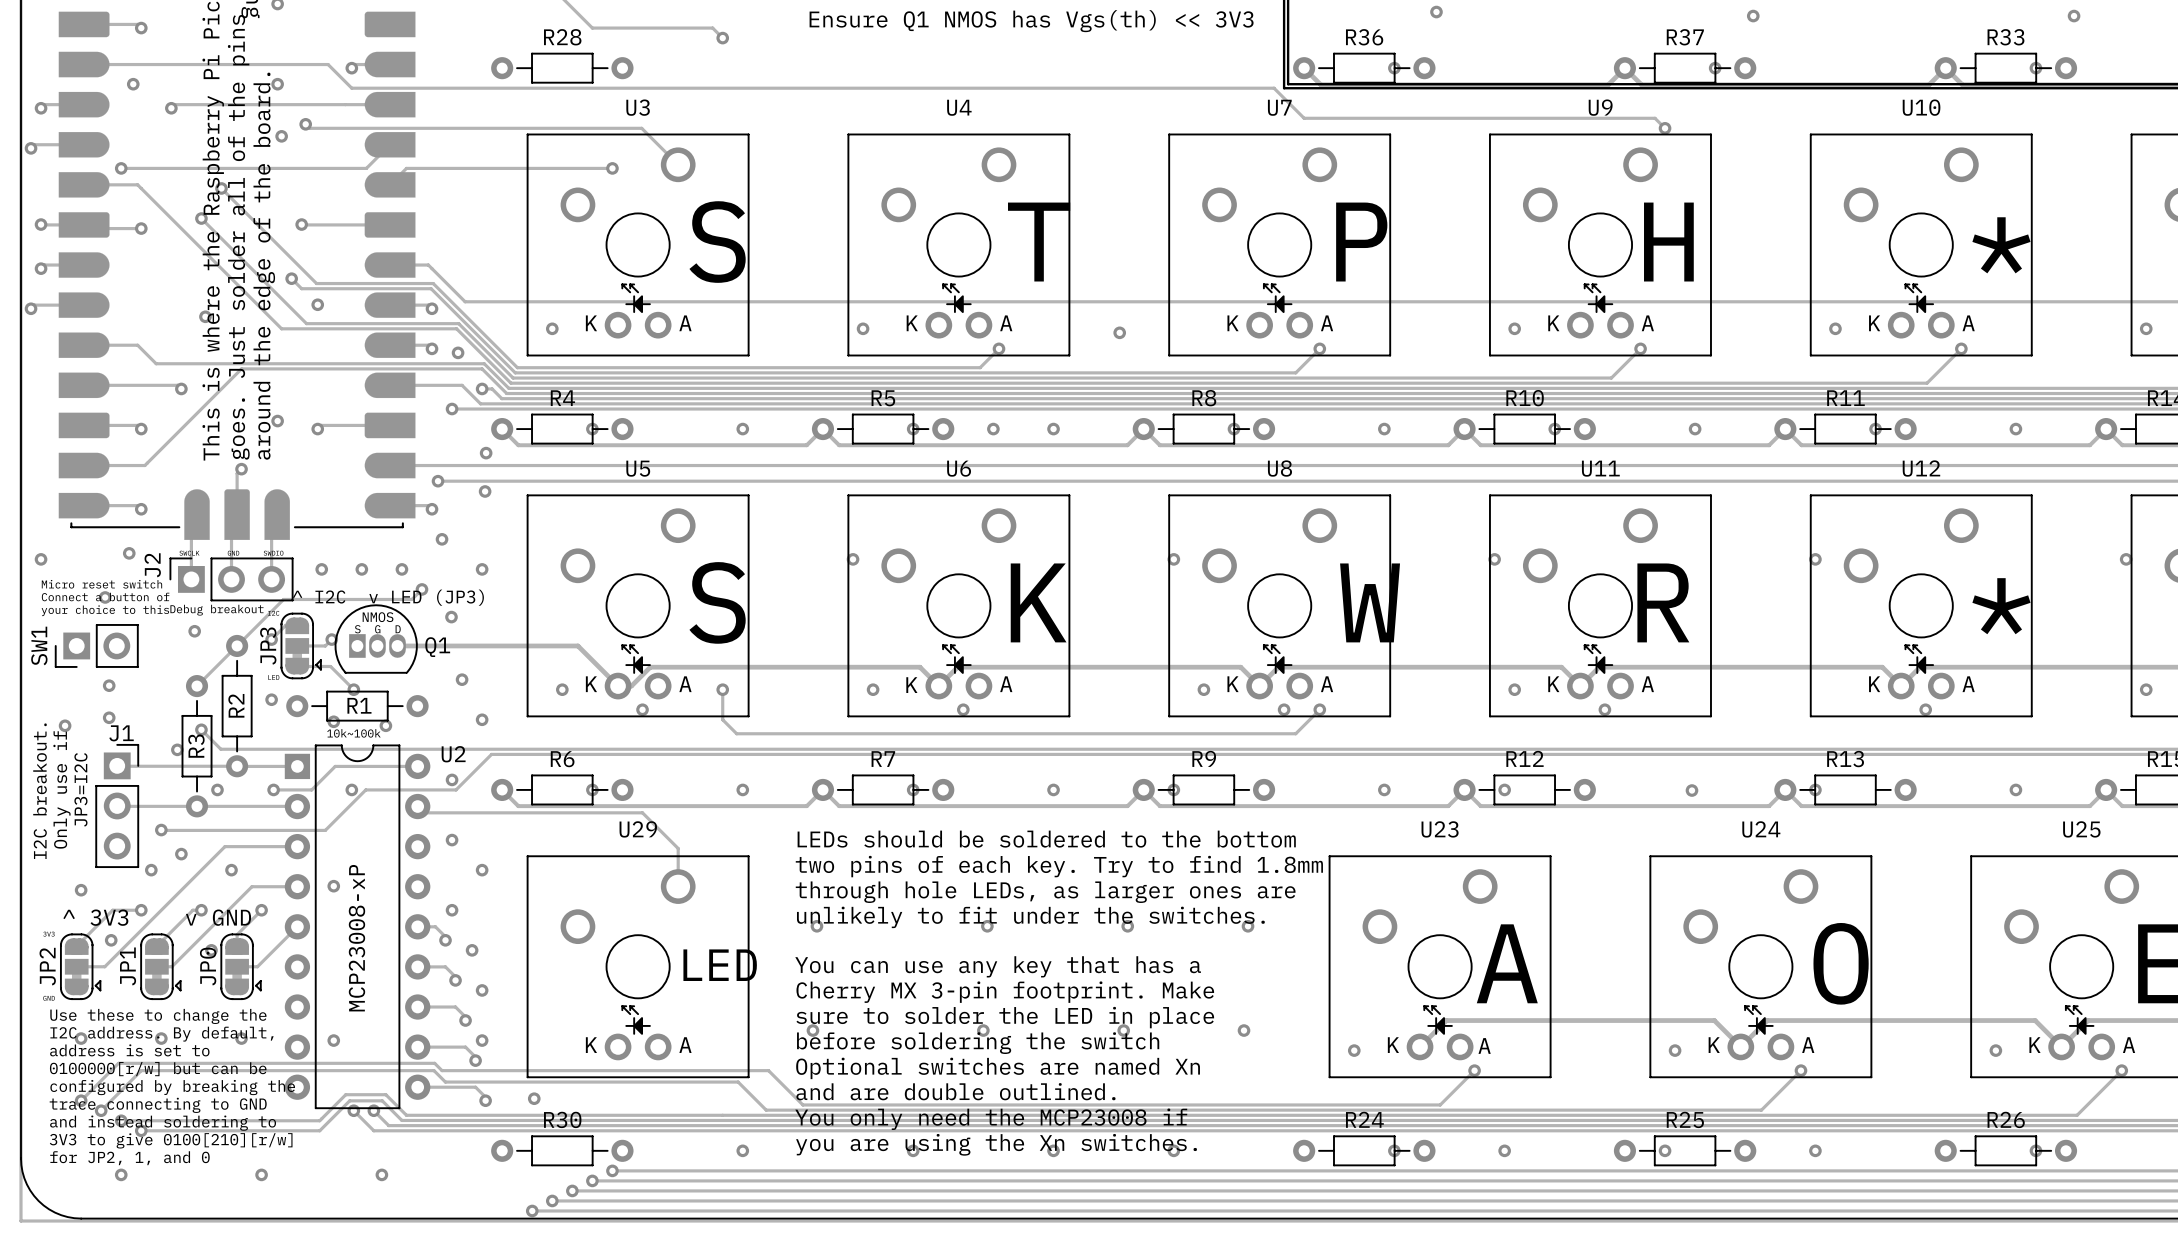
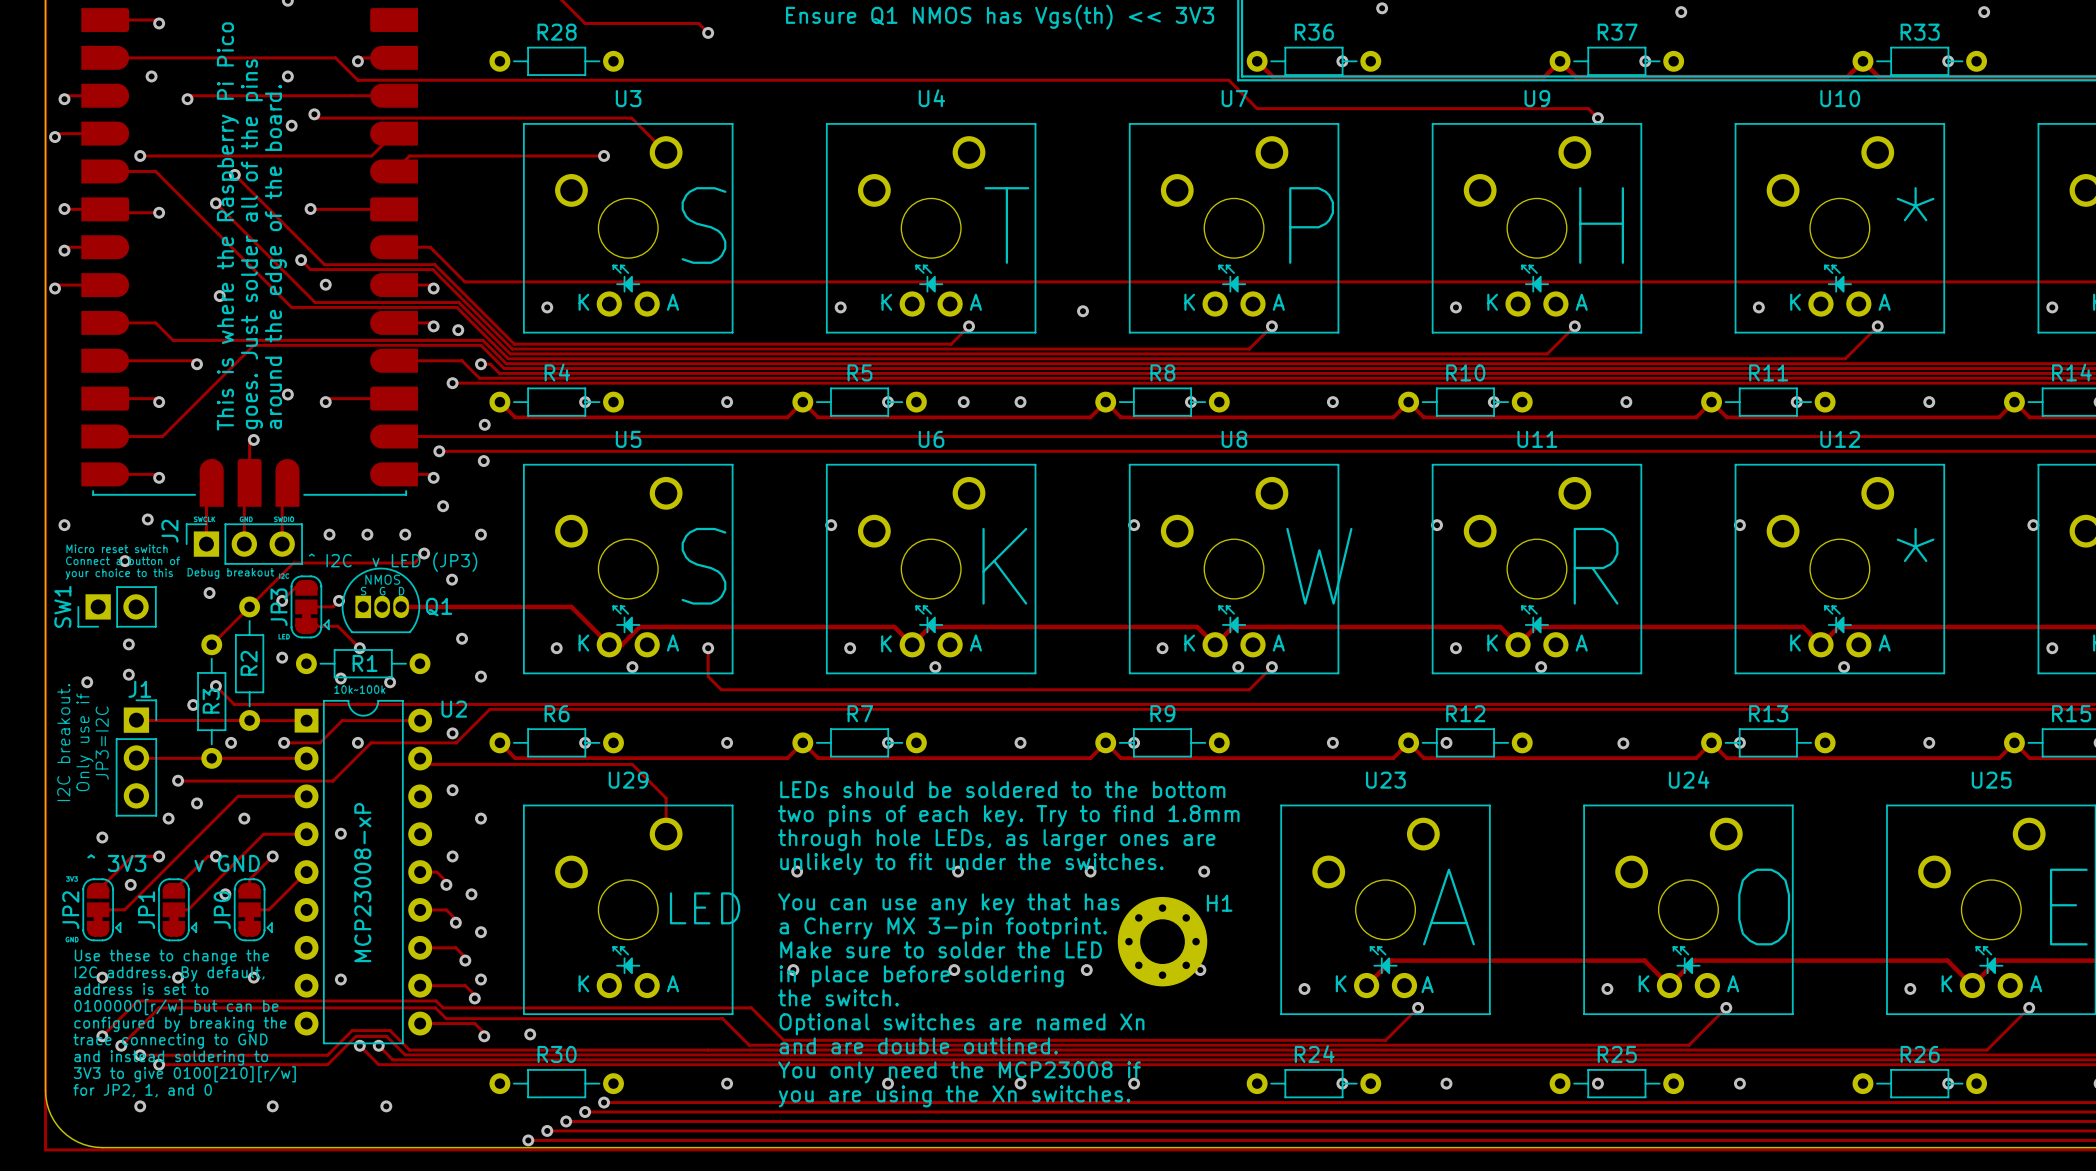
text: You can use any key that has a (998, 966) -> You can use any key that has (948, 904)
text: Cherry MX 3-pin footprint. Make (1005, 992) -> a Cherry MX 3-pin footprint. (943, 928)
H1: none -> (1162, 941)
text: sure to solder the LED in place (1005, 1017) -> Make sure to solder the LED (941, 949)
text: before soldering the switch (978, 1043) -> in place before soldering (921, 976)
text: Optional switches are named Xn (998, 1068) -> the switch. (838, 997)
text: and are double outlined. (955, 1091) -> Optional switches are named Xn (961, 1024)
text: You only need the MCP23008 if (991, 1119) -> and are double outlined. (918, 1045)
text: you are using the Xn switches. (996, 1144) -> You only need the MCP23008 if (959, 1072)
text: none -> you are using the Xn switches. (954, 1096)

